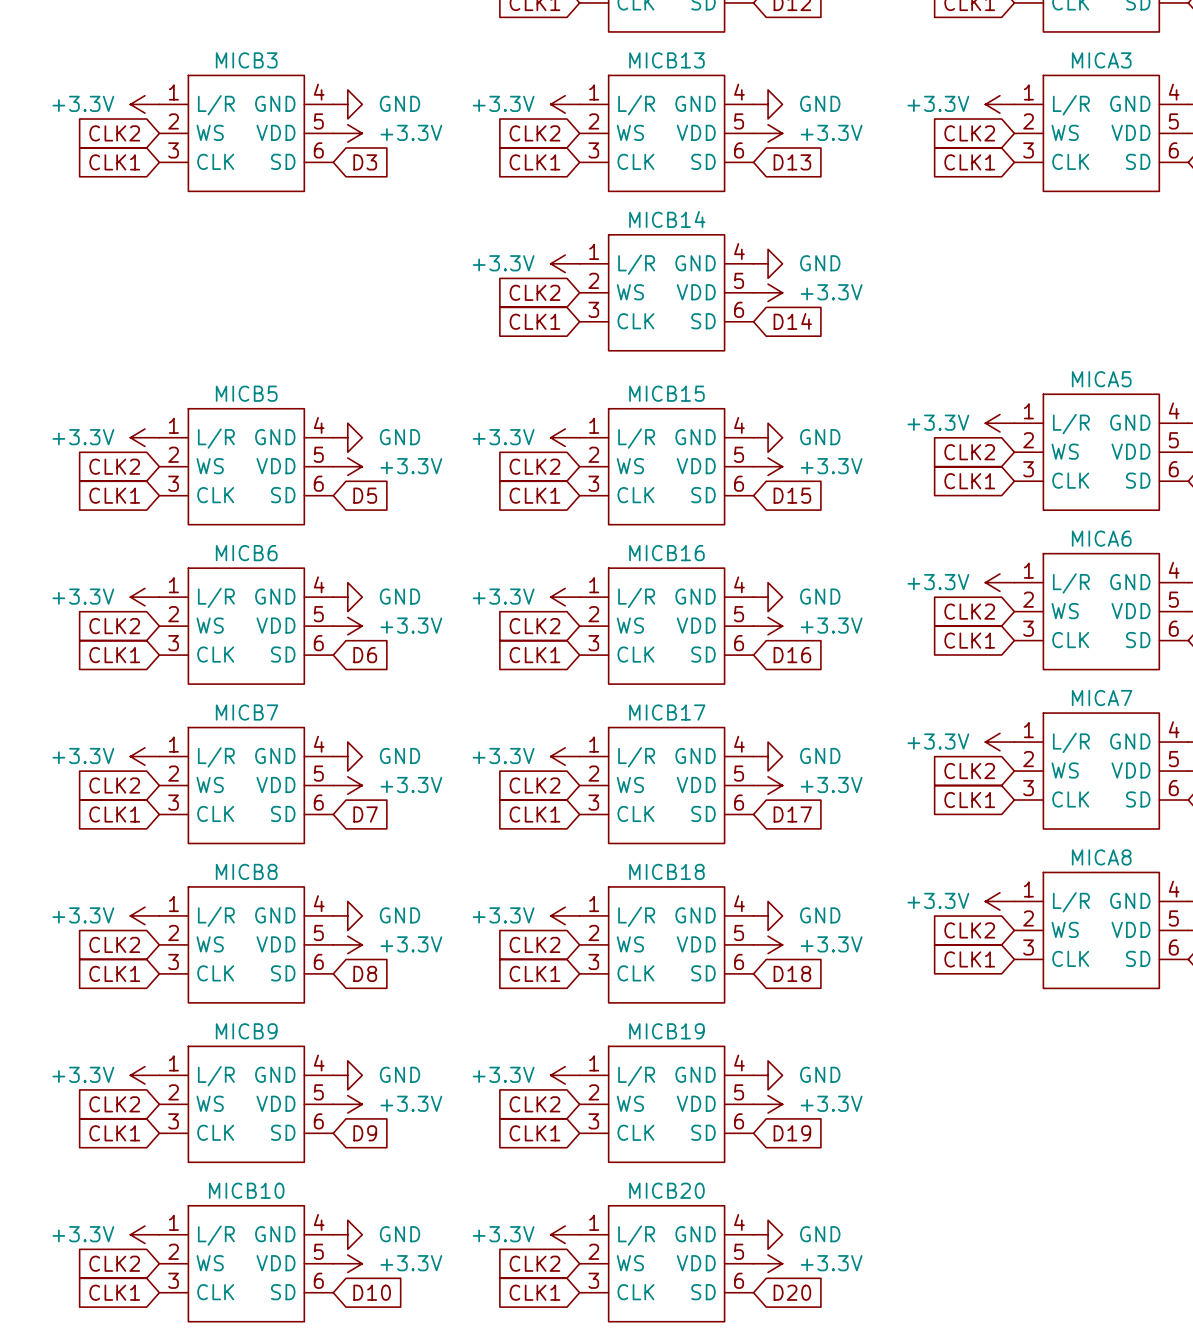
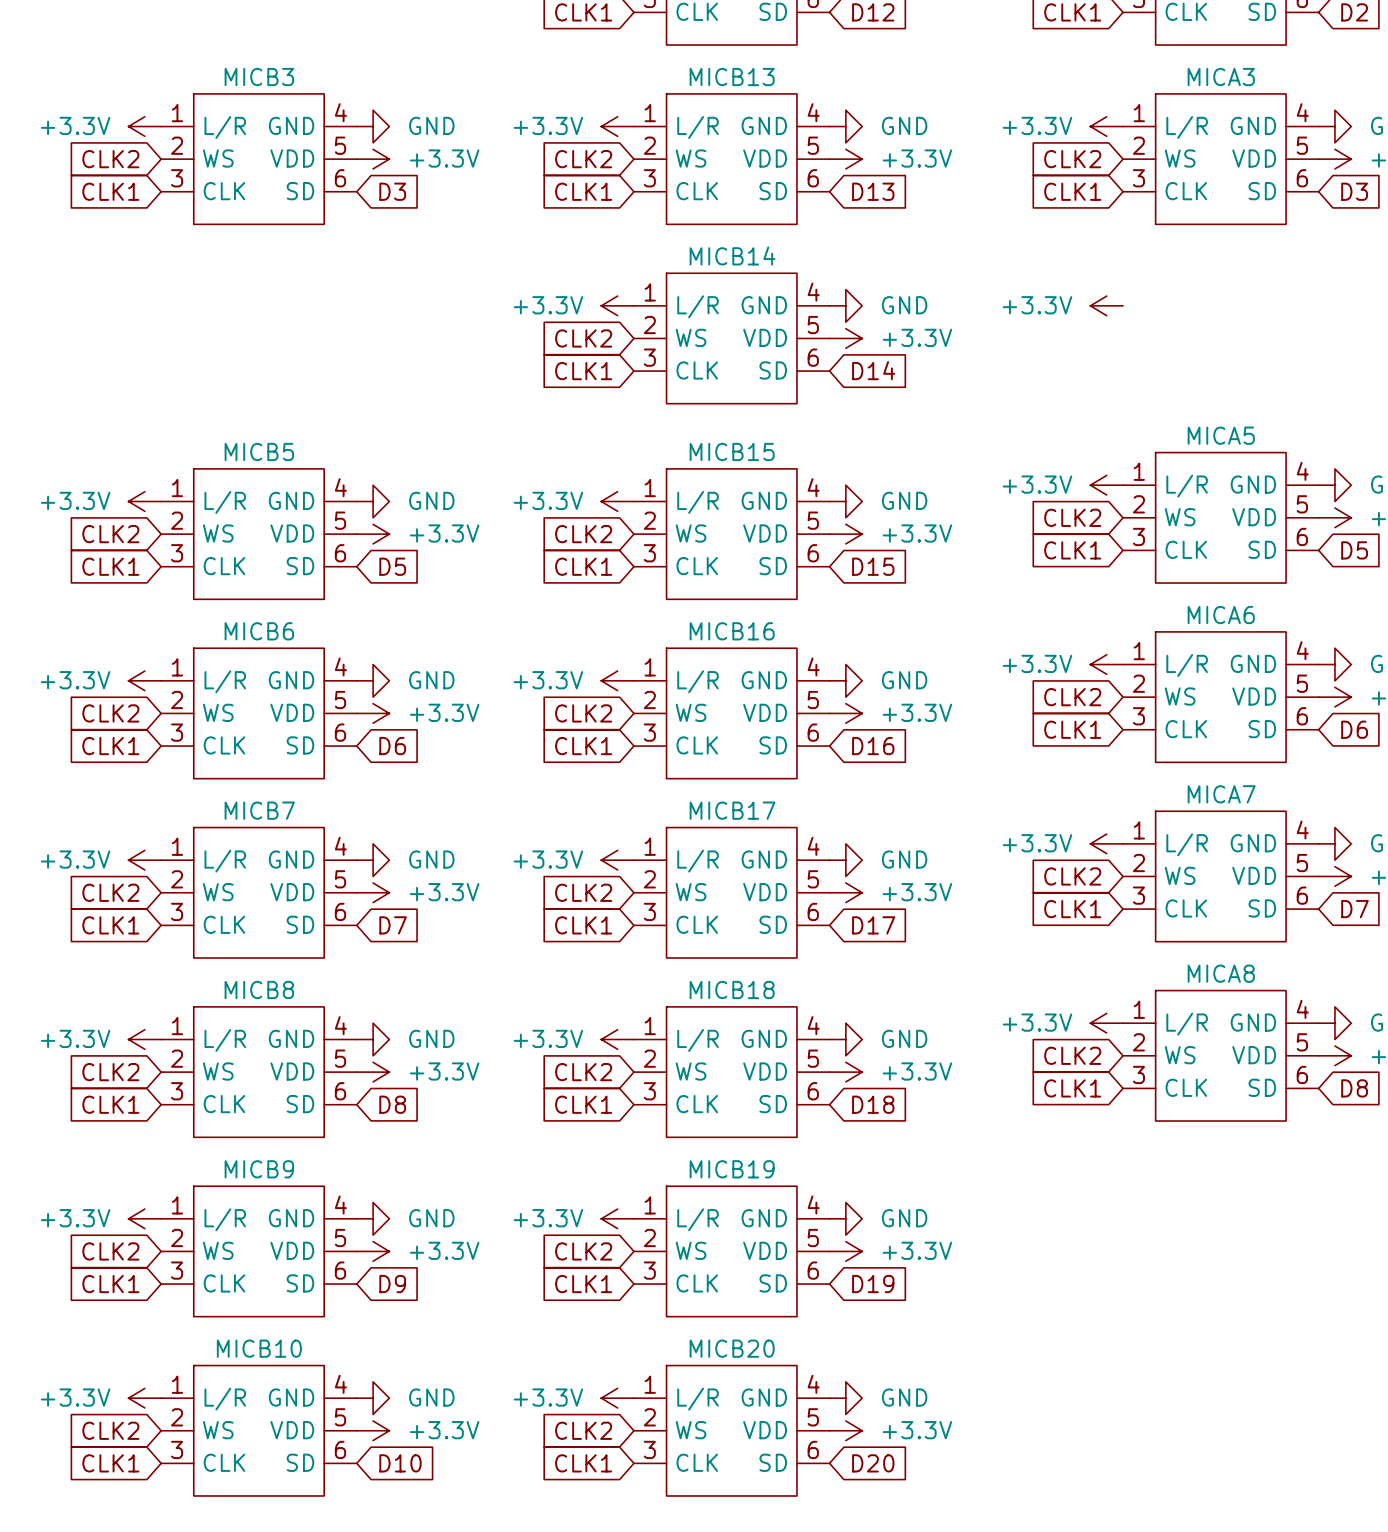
power symbol: none -> +3.3V (1106, 305)

